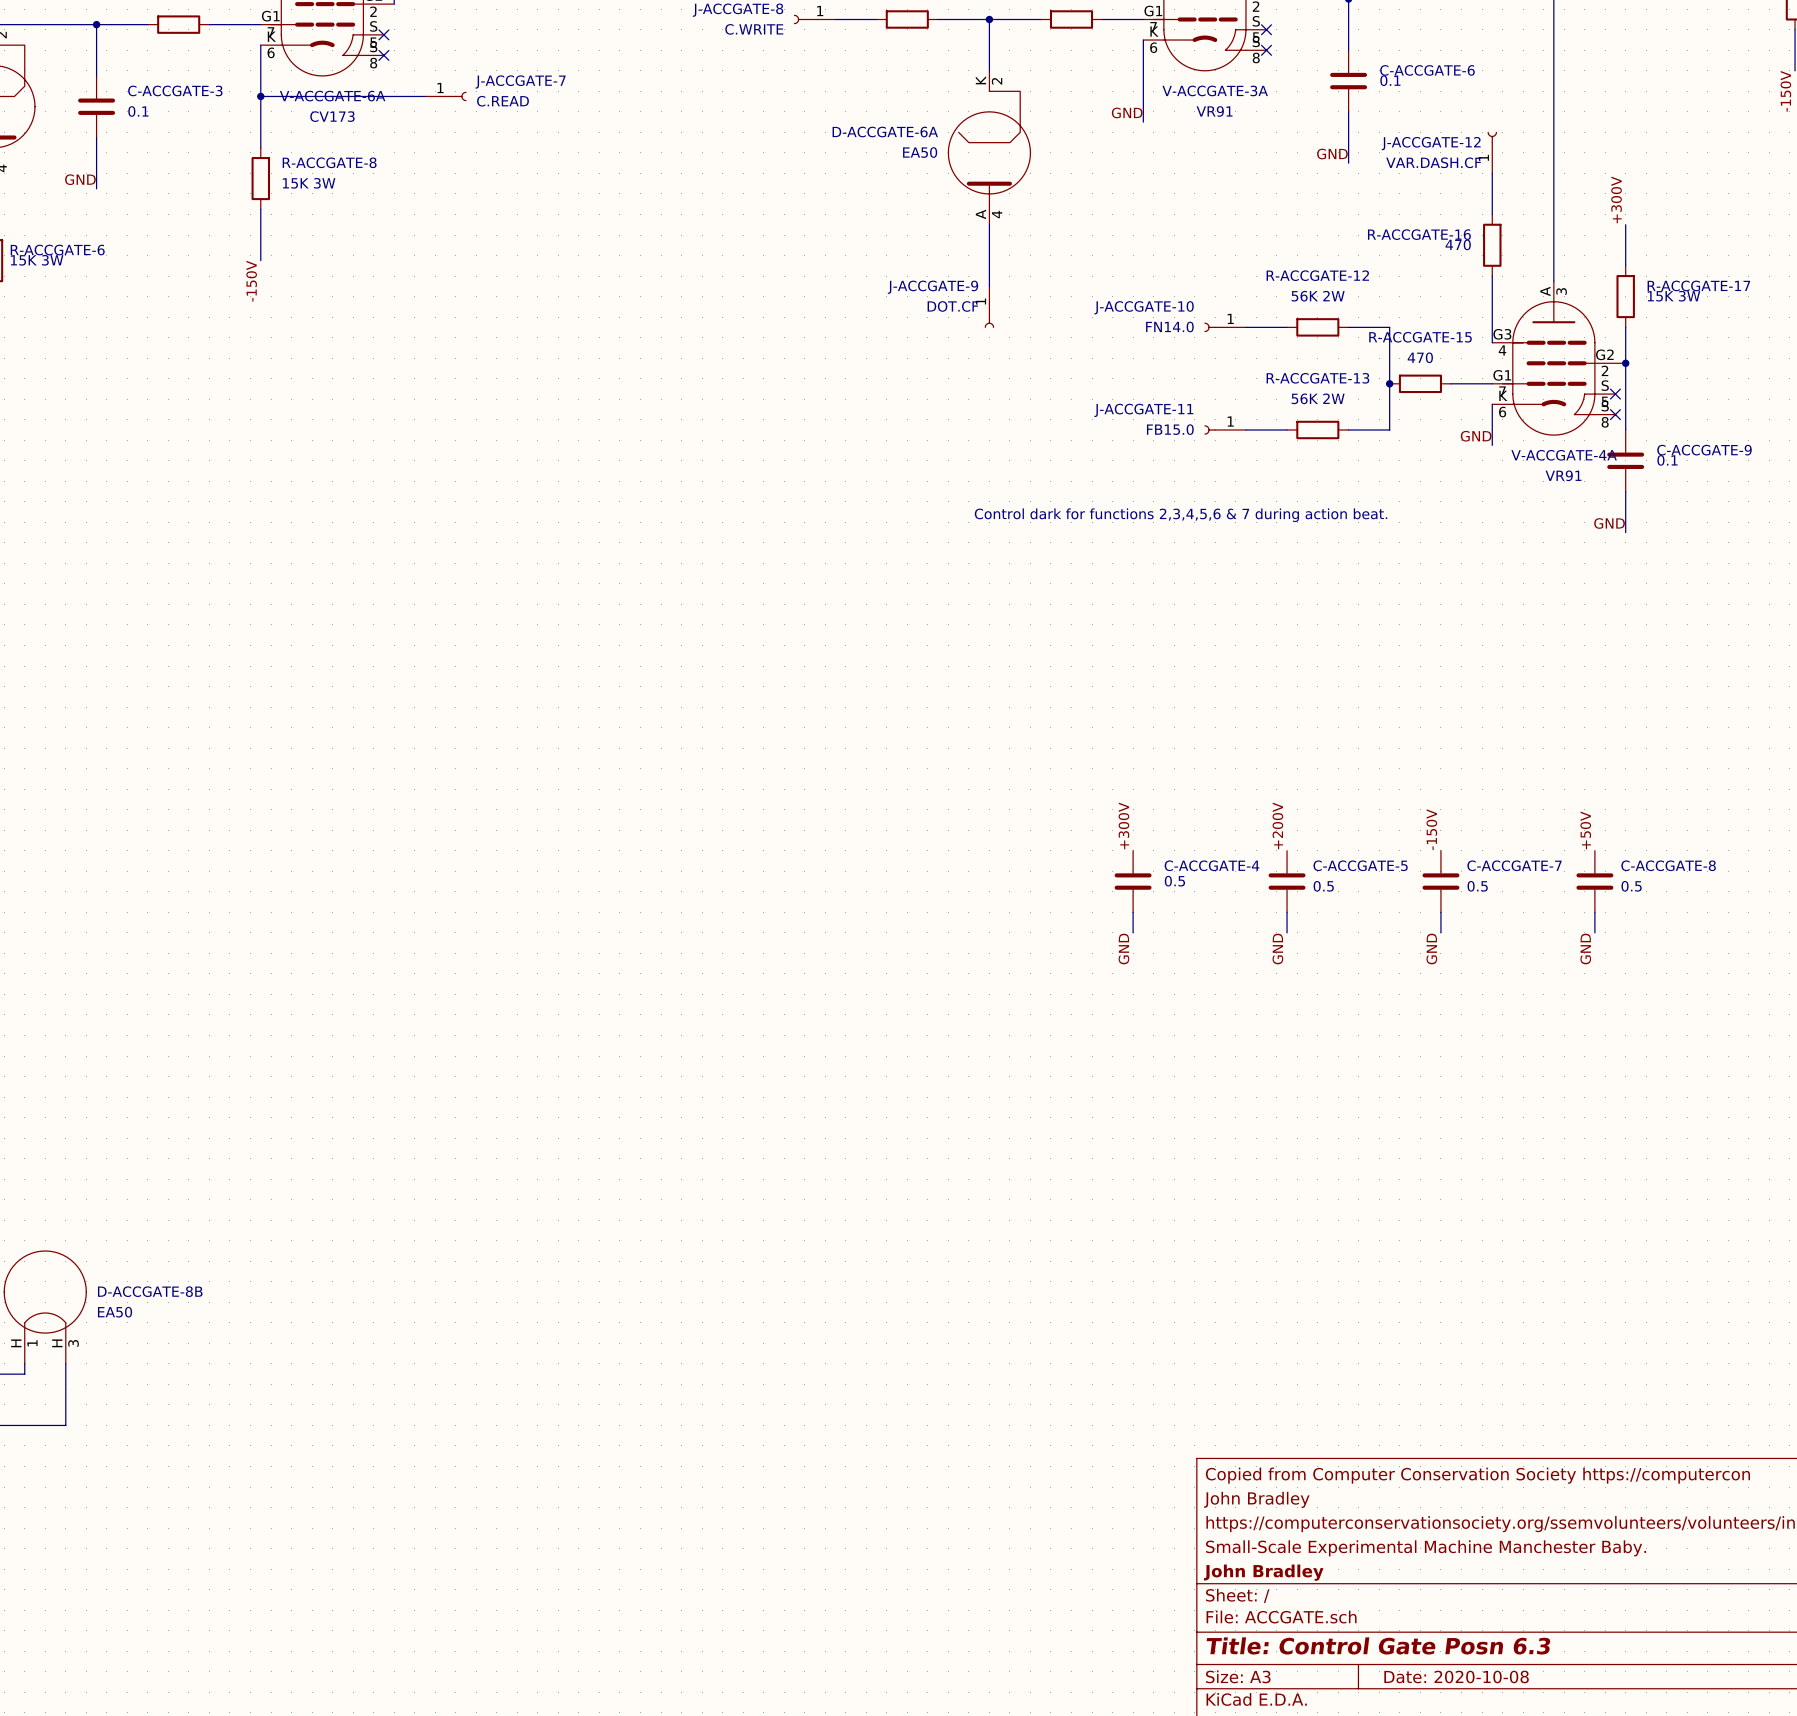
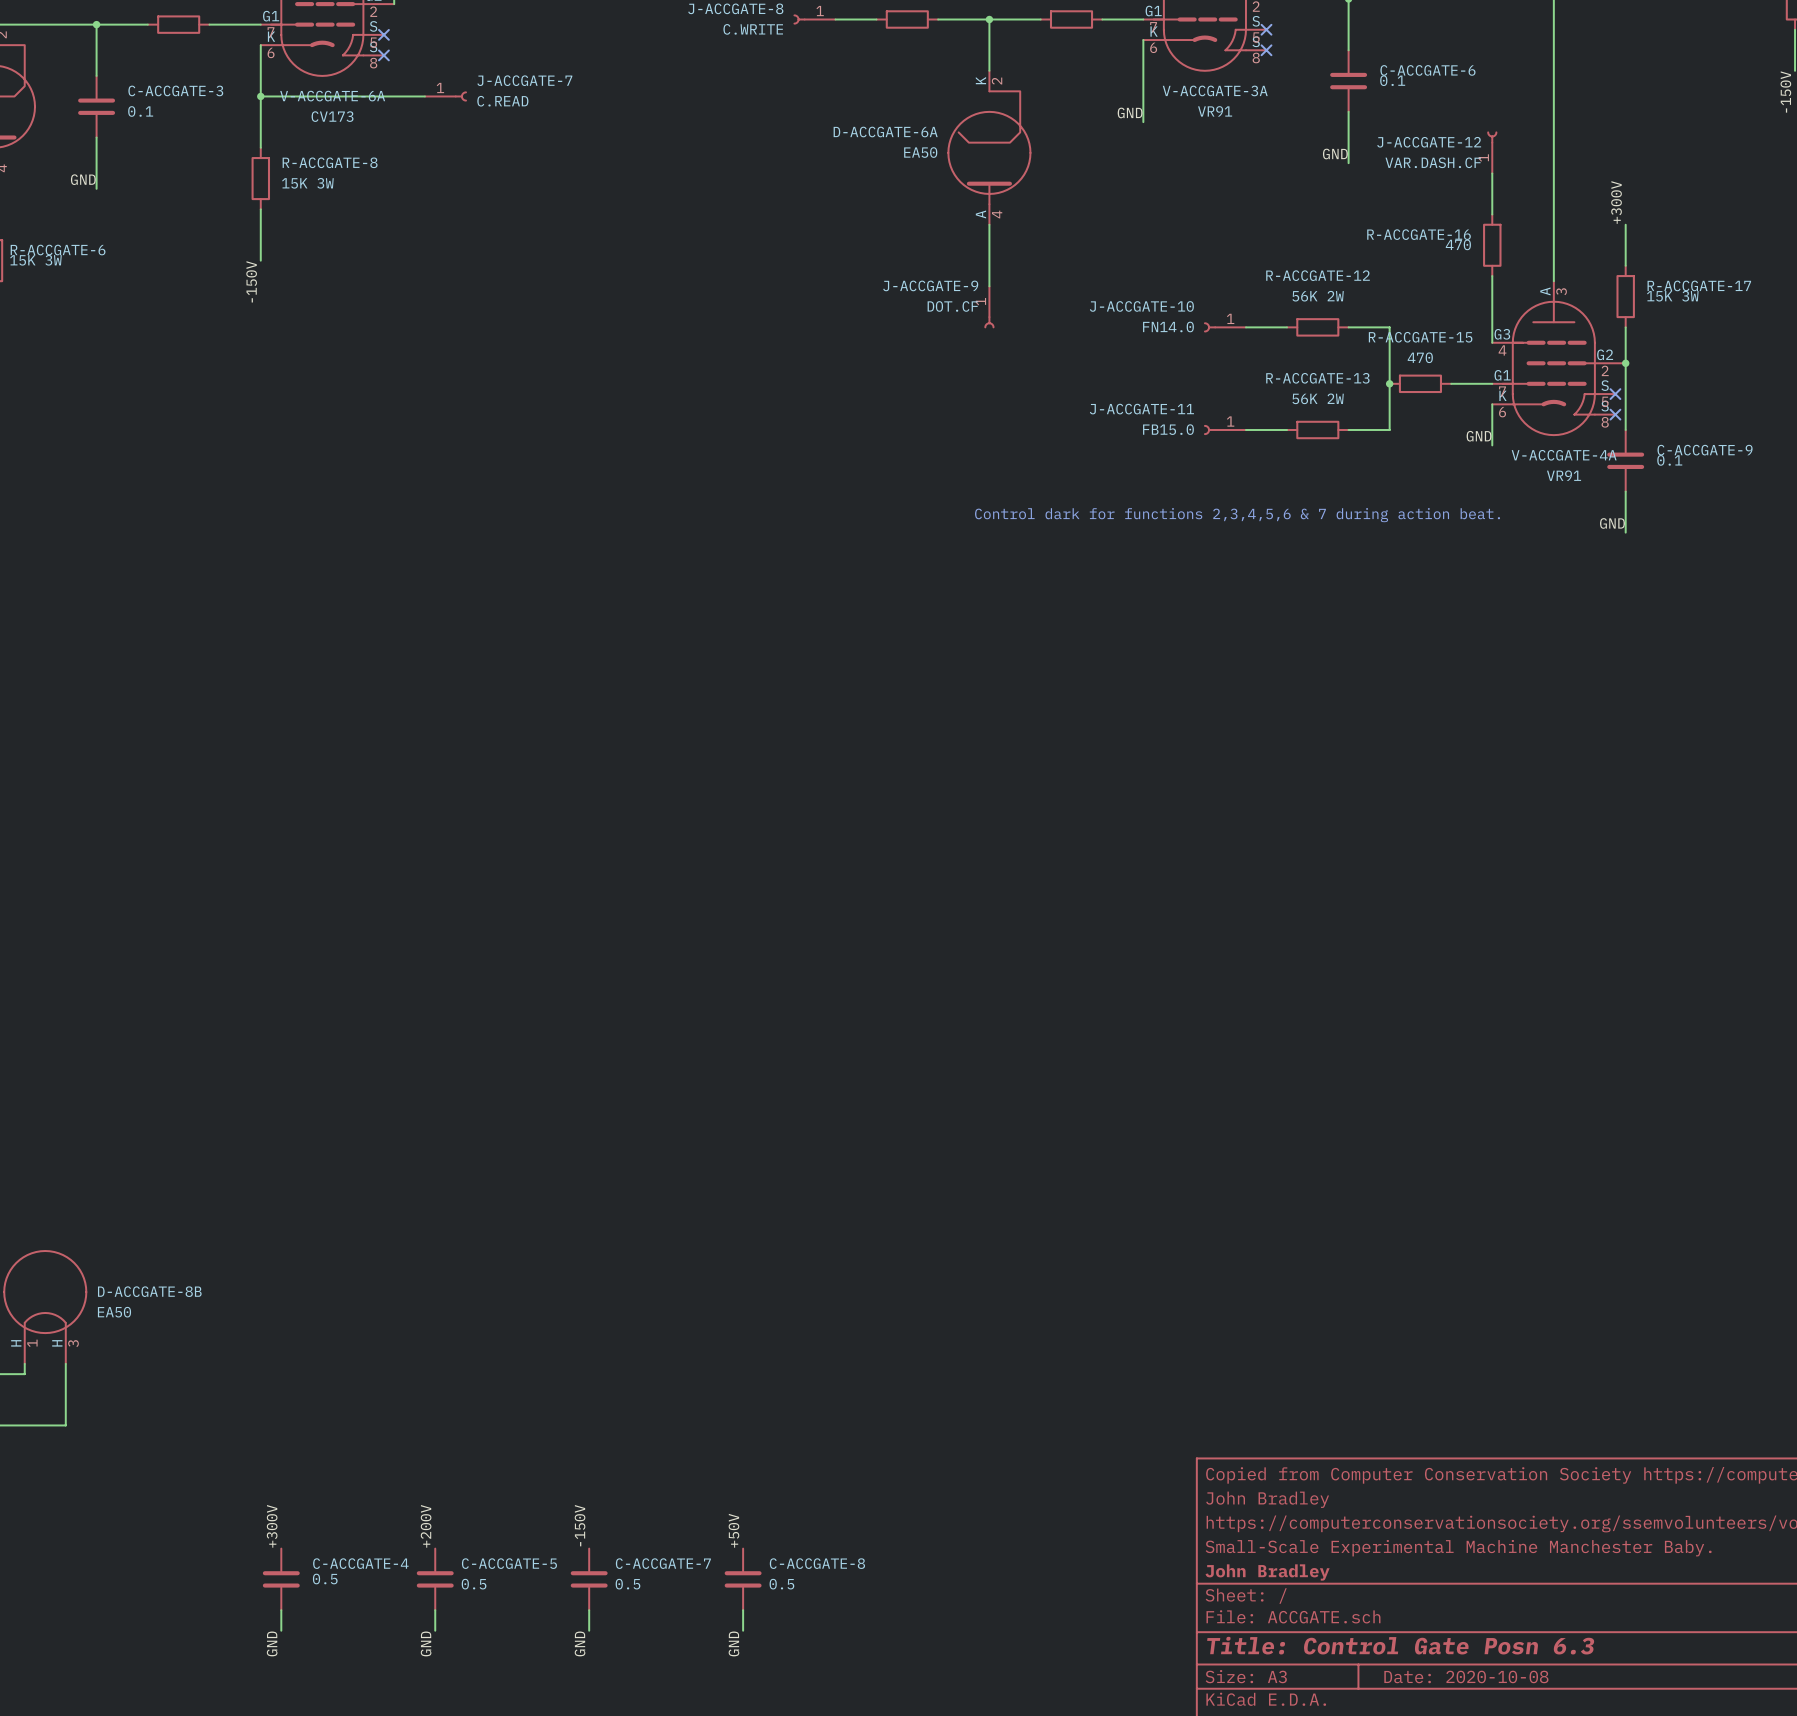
label: +300V (1123, 825) -> none
label: +200V (1277, 825) -> none
label: -150V (1431, 829) -> none
label: +50V (1585, 830) -> none
C-ACCGATE-4 position: (1133, 881) -> (281, 1579)
C-ACCGATE-5 position: (1287, 881) -> (435, 1579)
C-ACCGATE-7 position: (1440, 881) -> (589, 1579)
C-ACCGATE-8 position: (1594, 881) -> (743, 1579)
wire: (1133, 912) (1133, 932) -> none
wire: (1287, 912) (1287, 932) -> none
wire: (1440, 912) (1440, 932) -> none
wire: (1594, 912) (1594, 932) -> none
label: GND (1123, 949) -> none
label: GND (1277, 949) -> none
label: GND (1431, 949) -> none
label: GND (1585, 949) -> none
label: none -> +300V (272, 1526)
label: none -> +200V (426, 1526)
label: none -> -150V (580, 1525)
label: none -> +50V (733, 1530)
wire: none -> (281, 1610) (281, 1630)
wire: none -> (435, 1610) (435, 1630)
wire: none -> (589, 1610) (589, 1630)
wire: none -> (743, 1610) (743, 1630)
label: none -> GND (272, 1643)
label: none -> GND (426, 1643)
label: none -> GND (580, 1643)
label: none -> GND (733, 1643)

